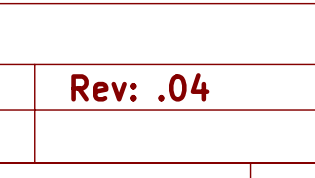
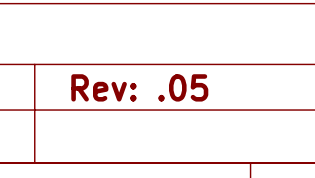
title block: Rev: .04 (140, 87) -> Rev: .05 (139, 87)

